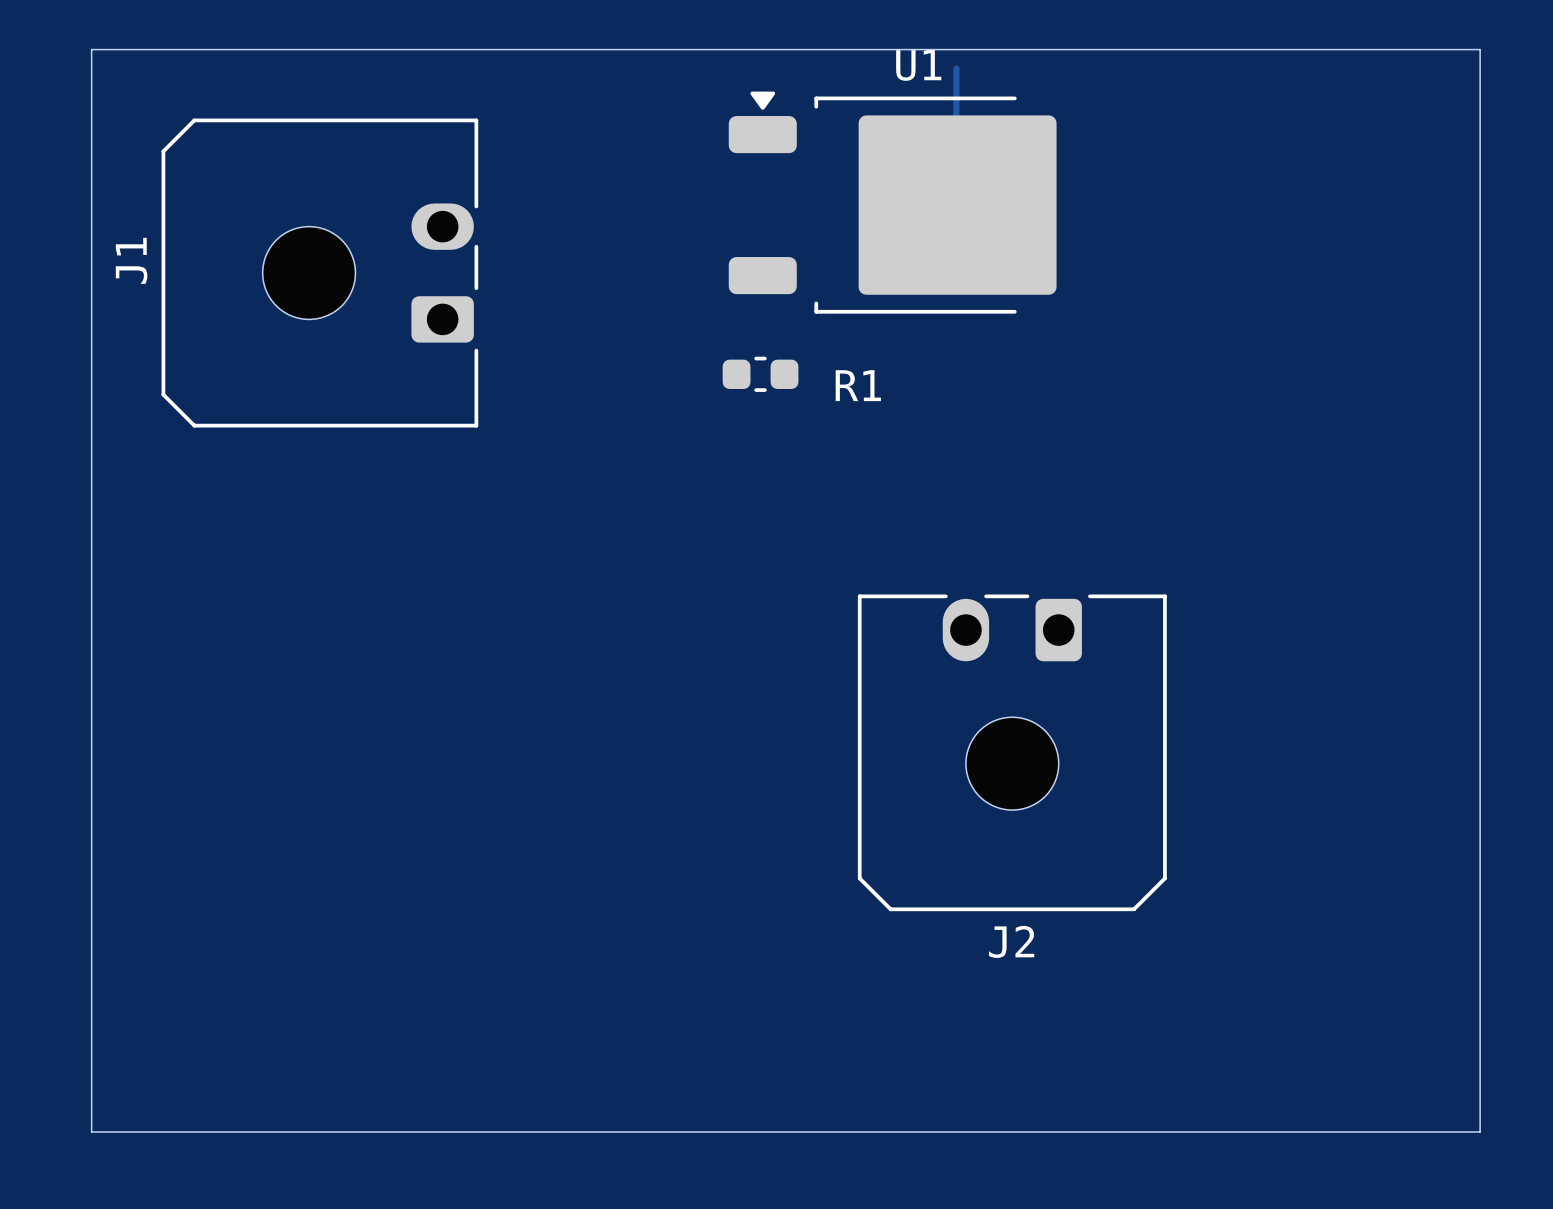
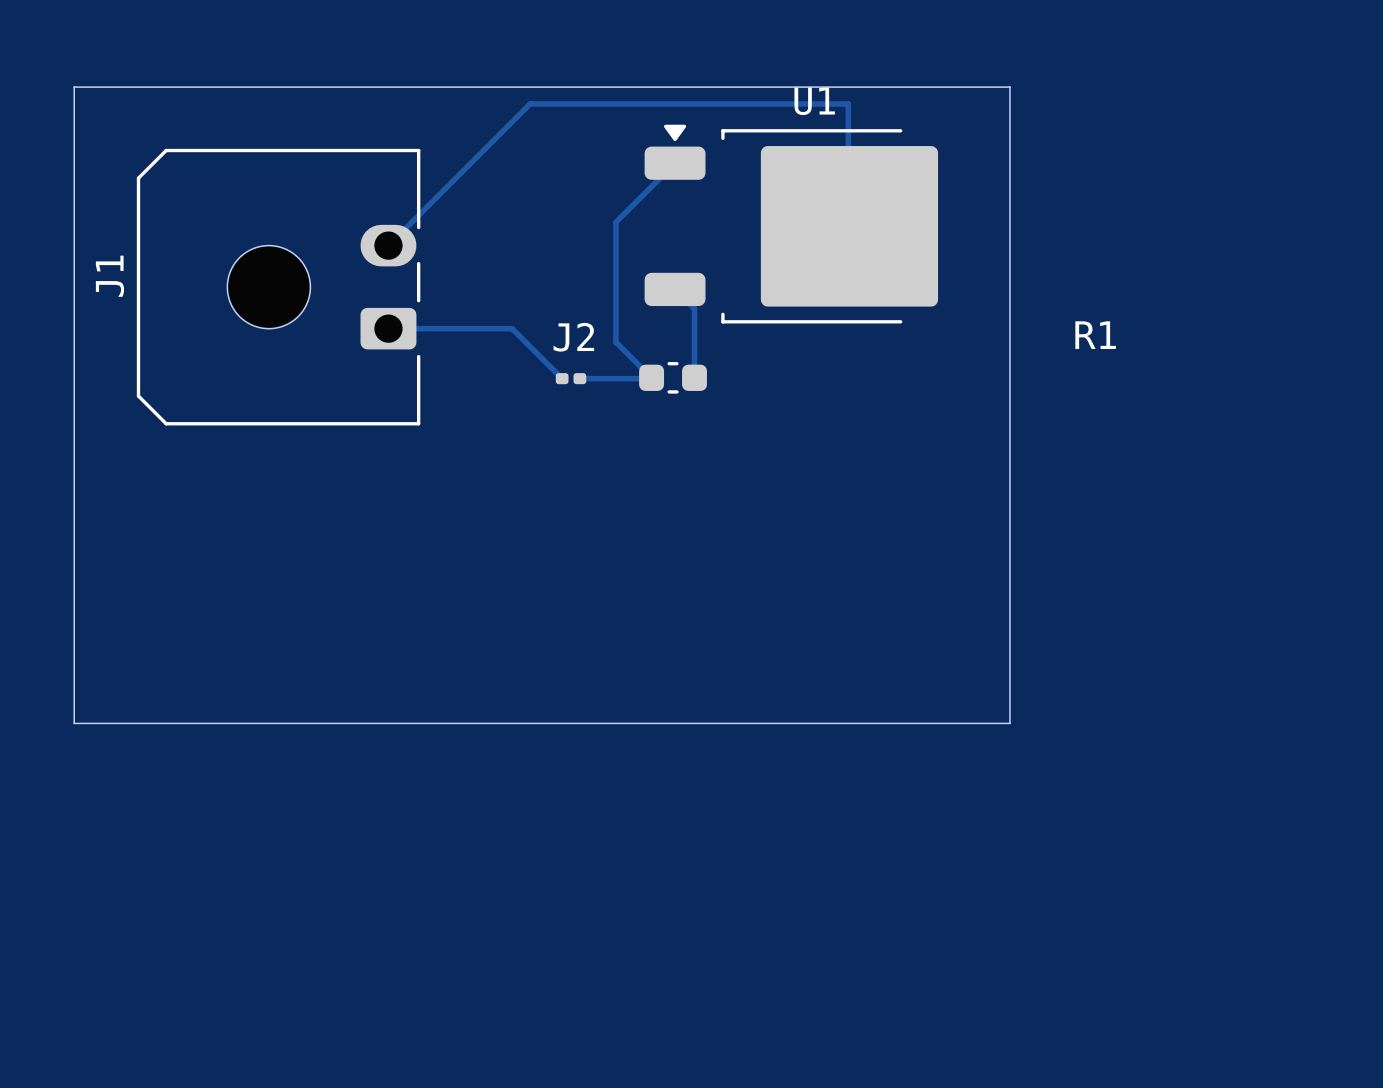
board edge: (1136, 49) (1480, 49) (1480, 1131) (91, 1131) (91, 760) -> (1009, 87) (1009, 723) (74, 723)
track: none -> (848, 103) (530, 103) (388, 245)
track: none -> (675, 163) (615, 222) (615, 342) (651, 377)
track: none -> (675, 289) (694, 308) (694, 377)
track: none -> (388, 328) (512, 328) (562, 378)
track: none -> (579, 378) (650, 378)
R1 name position: R1 (858, 385) -> R1 (1095, 335)
J2 footprint: [857, 594, 1167, 912] -> [555, 373, 587, 385]
J2 name position: J2 (1011, 941) -> J2 (573, 337)

